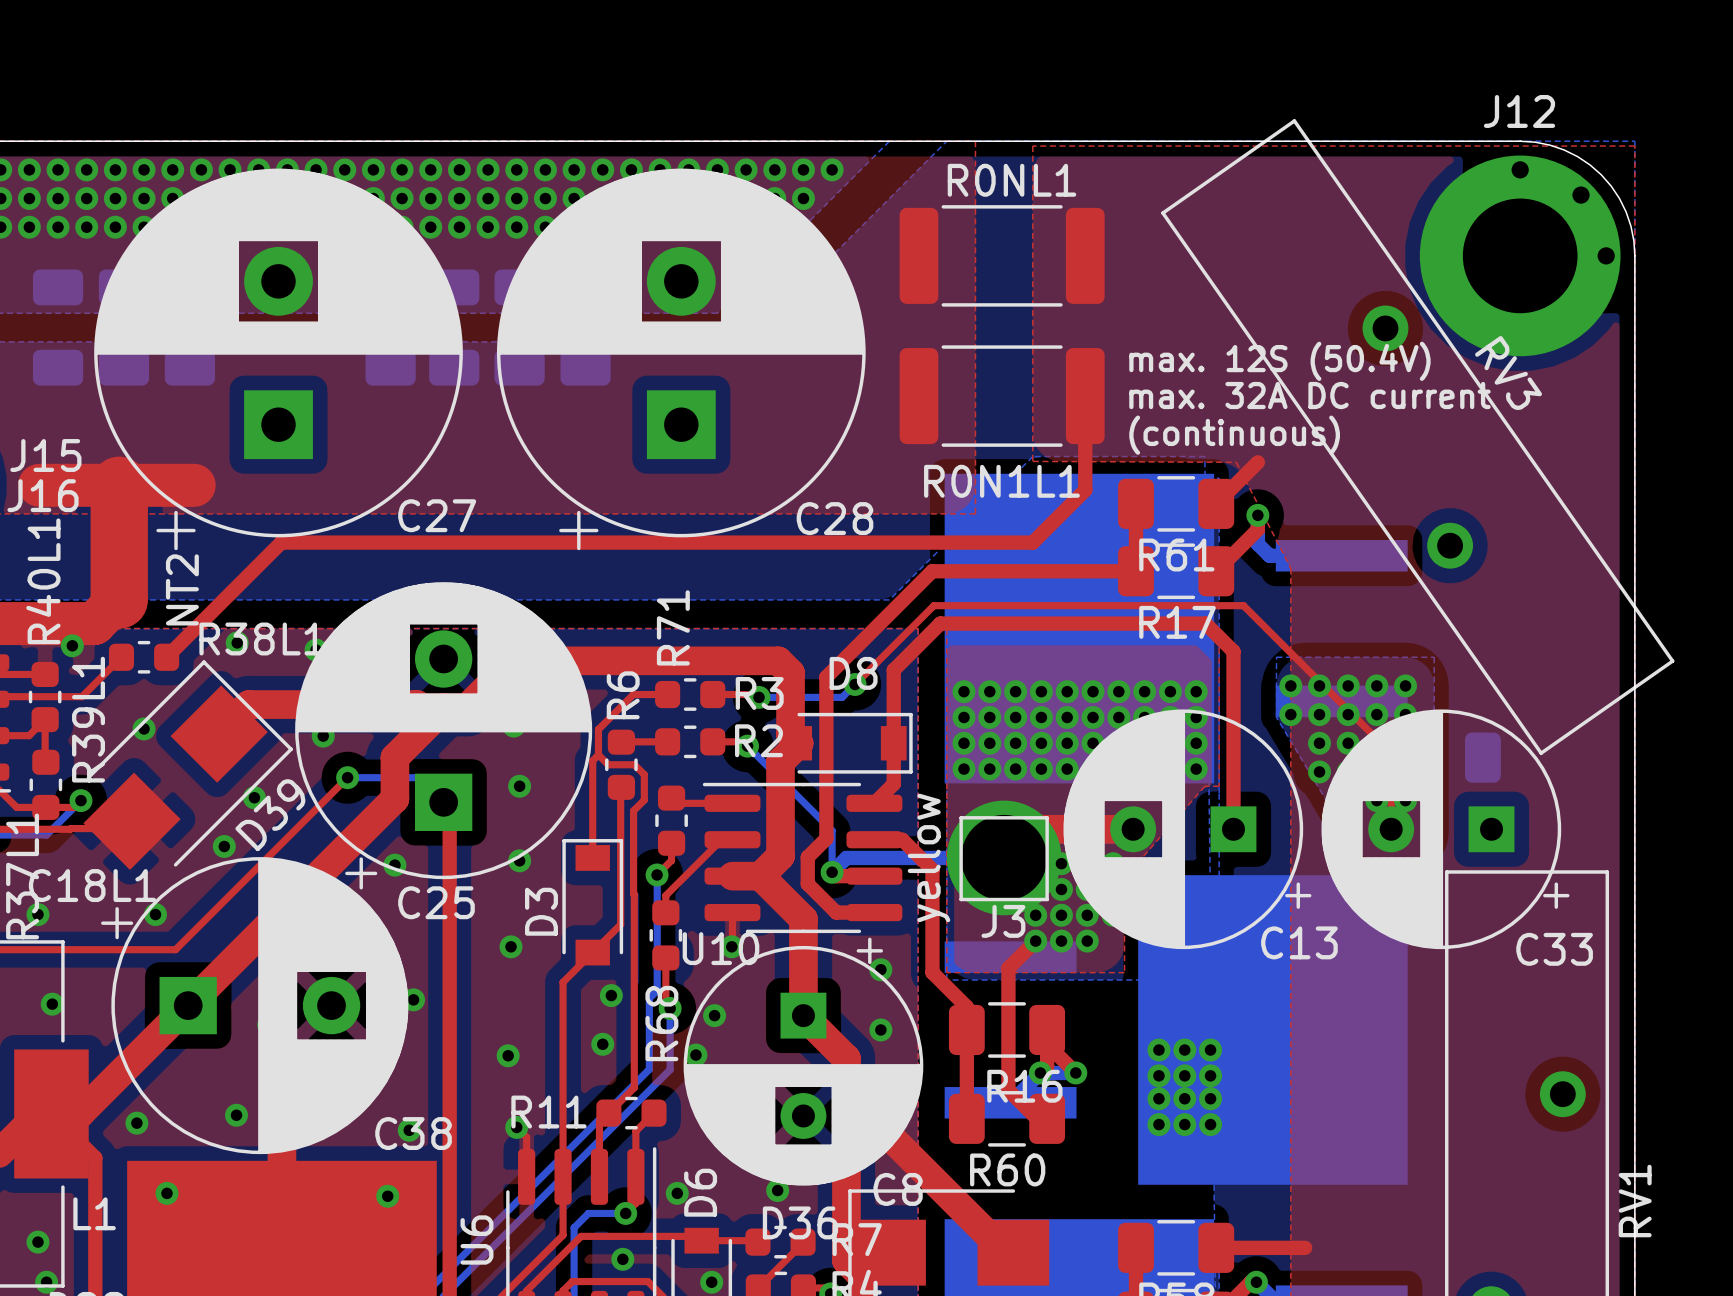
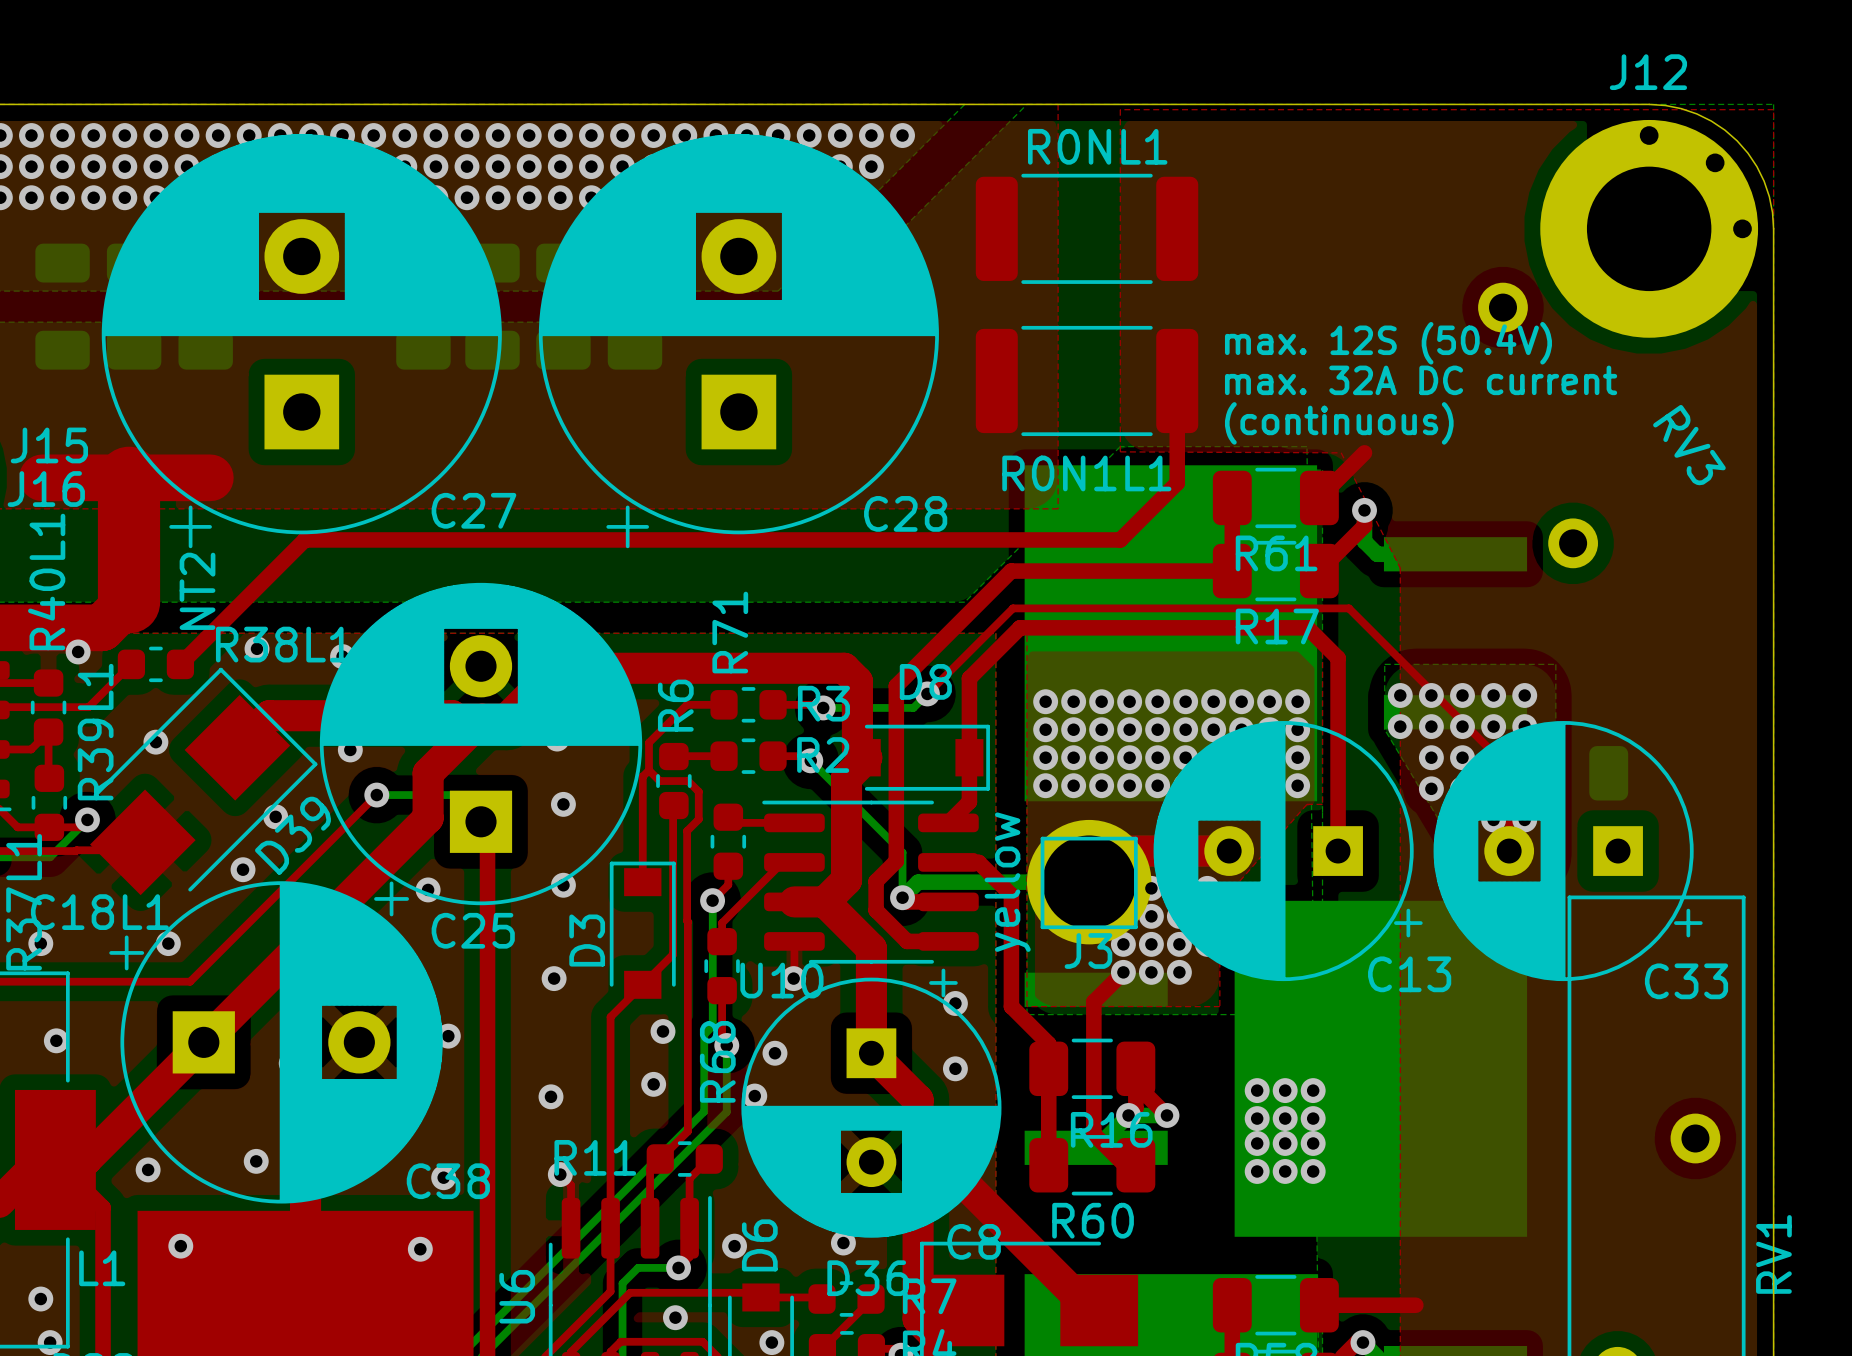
RV3 footprint: [1161, 119, 1675, 755] -> [1478, 282, 1598, 569]
RV3 name position: RV3 (1508, 373) -> RV3 (1689, 445)

